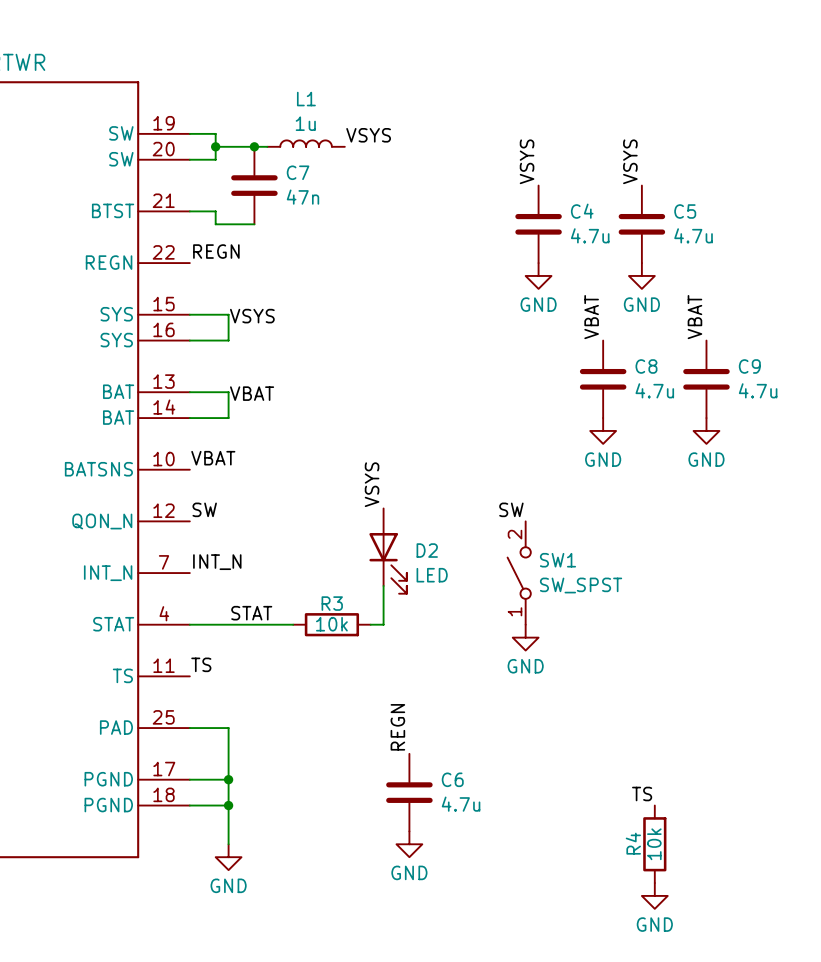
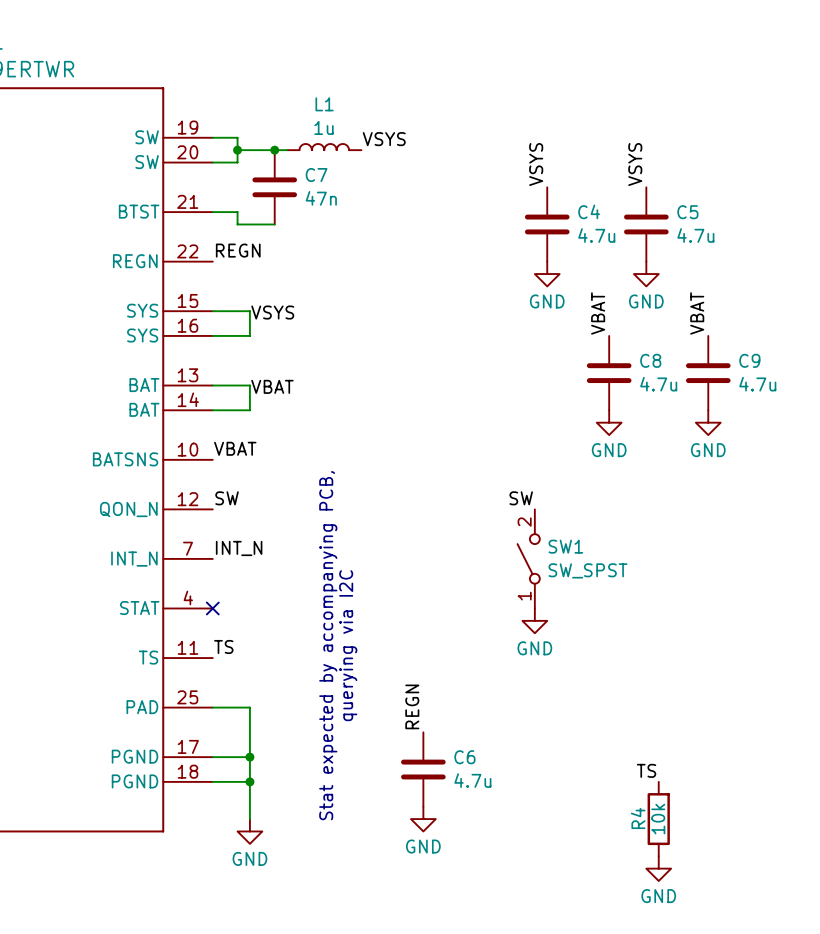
label: VSYS (372, 484) -> none
D2: LED (388, 551) -> none
wire: (383, 585) (383, 624) (370, 624) -> none
label: STAT (251, 613) -> none
wire: (189, 624) (293, 624) -> none
no-connect mark: none -> (212, 608)
R3: 10k (331, 624) -> none
text: none -> Stat expected by accompanying PCB, (328, 645)
text: none -> querying via I2C (348, 645)

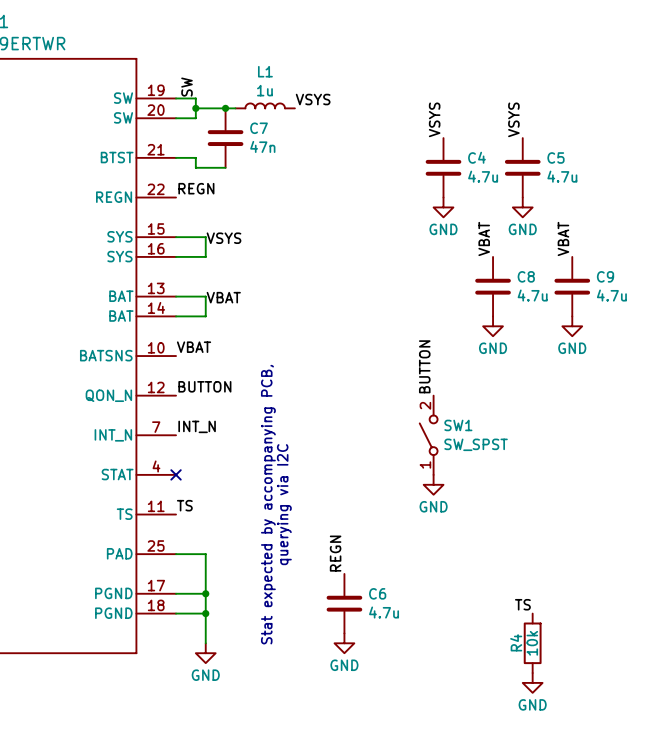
label: none -> SW (187, 87)
label: SW (227, 498) -> BUTTON (204, 386)
label: SW (521, 498) -> BUTTON (424, 366)

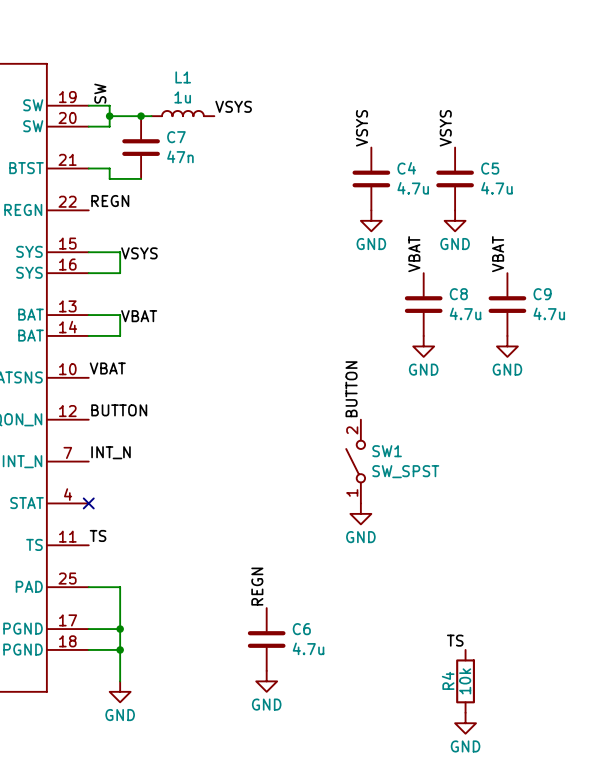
text: Stat expected by accompanying PCB, (268, 504) -> none
text: querying via I2C (284, 504) -> none

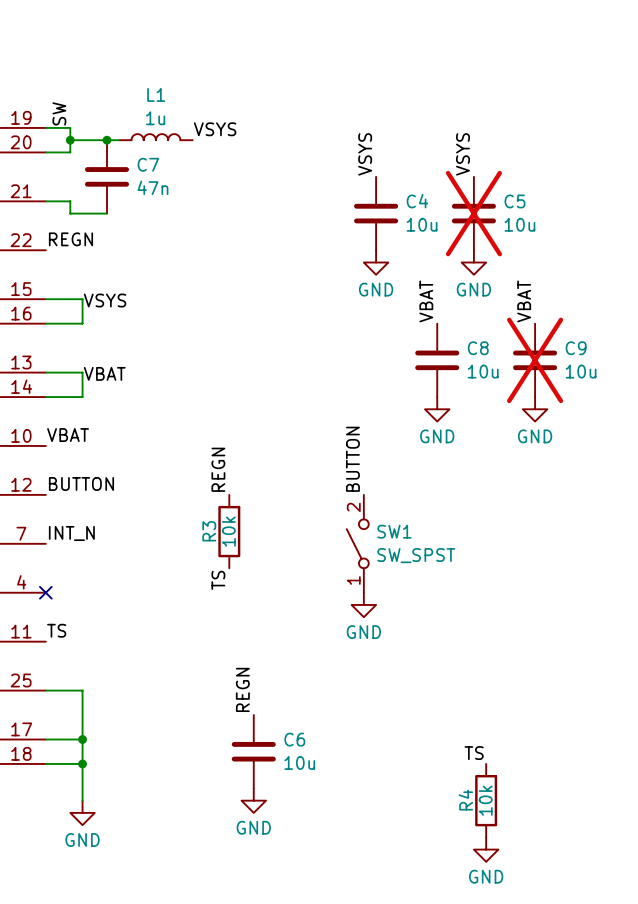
C5 do-not-place cross: none -> (473, 213)
C4 value: 4.7u (413, 188) -> 10u (422, 224)
C5 value: 4.7u (496, 188) -> 10u (519, 224)
C9 do-not-place cross: none -> (535, 360)
C8 value: 4.7u (465, 313) -> 10u (483, 371)
C9 value: 4.7u (549, 313) -> 10u (581, 371)
label: none -> REGN (218, 469)
R3: none -> 10k (229, 531)
label: none -> TS (218, 580)
C6 value: 4.7u (308, 648) -> 10u (299, 762)

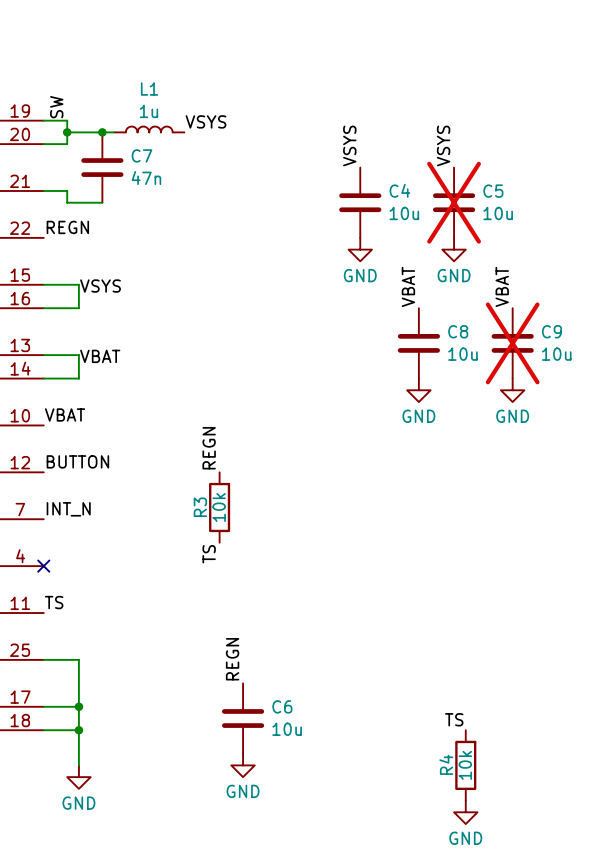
label: BUTTON (352, 459) -> none
SW1: SW_SPST (357, 543) -> none
power symbol: GND (363, 604) -> none

